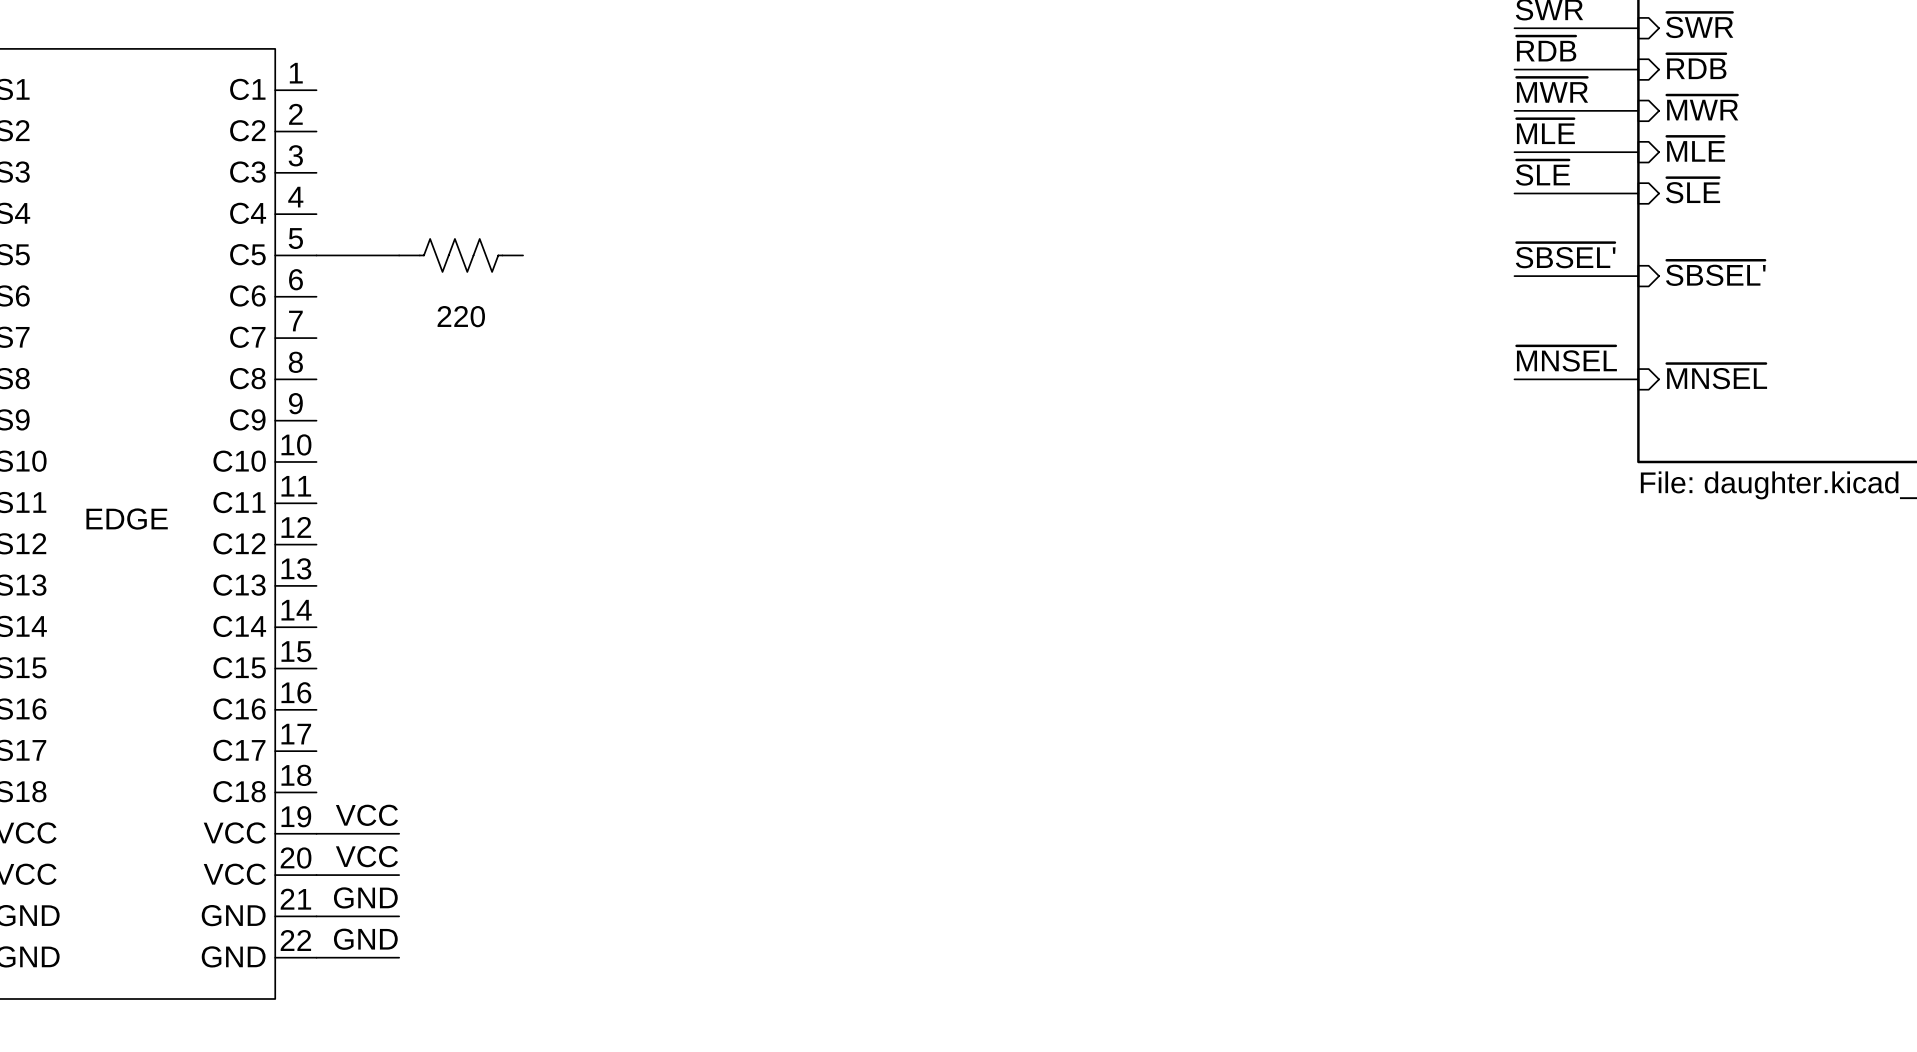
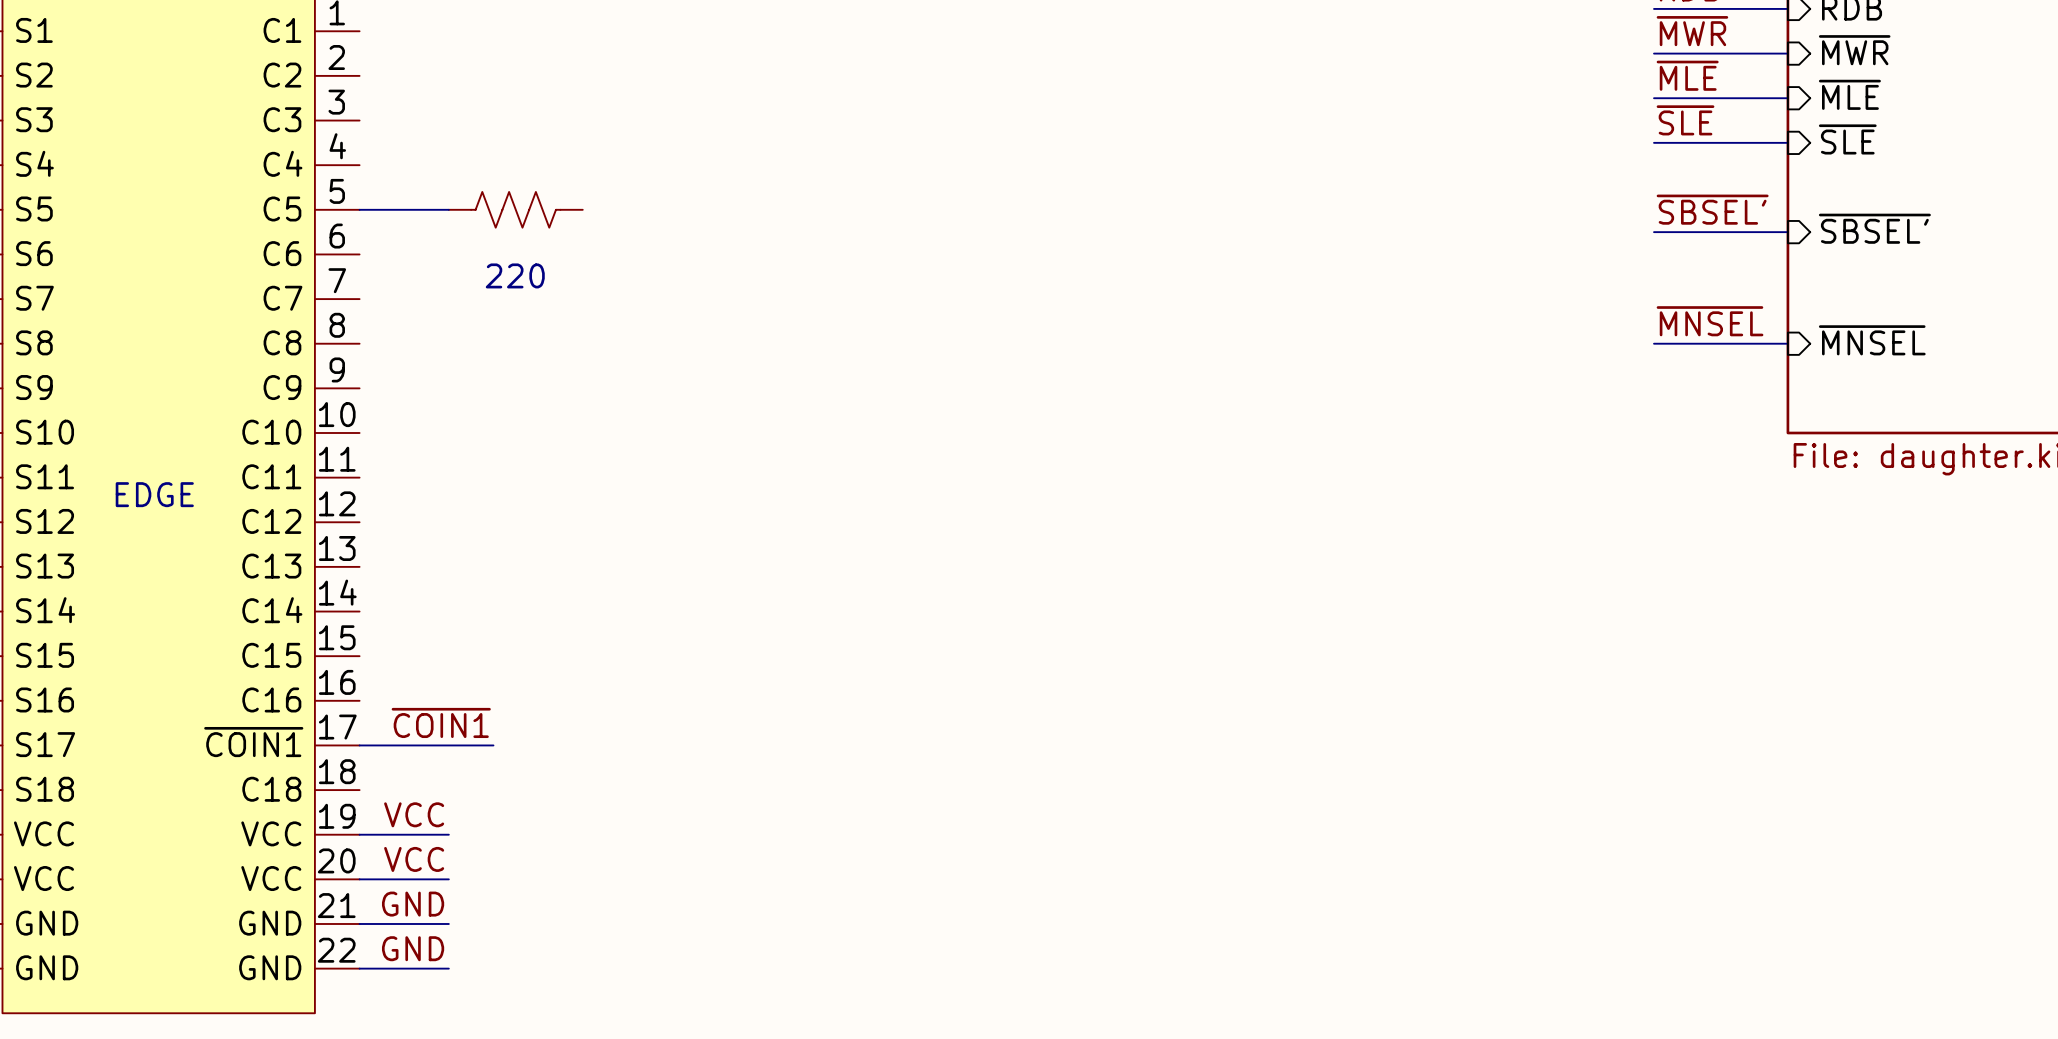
label: none -> ~{COIN1} (441, 722)
EDGE pin name: C17 (239, 750) -> ~{COIN1} (253, 742)
wire: none -> (359, 745) (493, 745)

